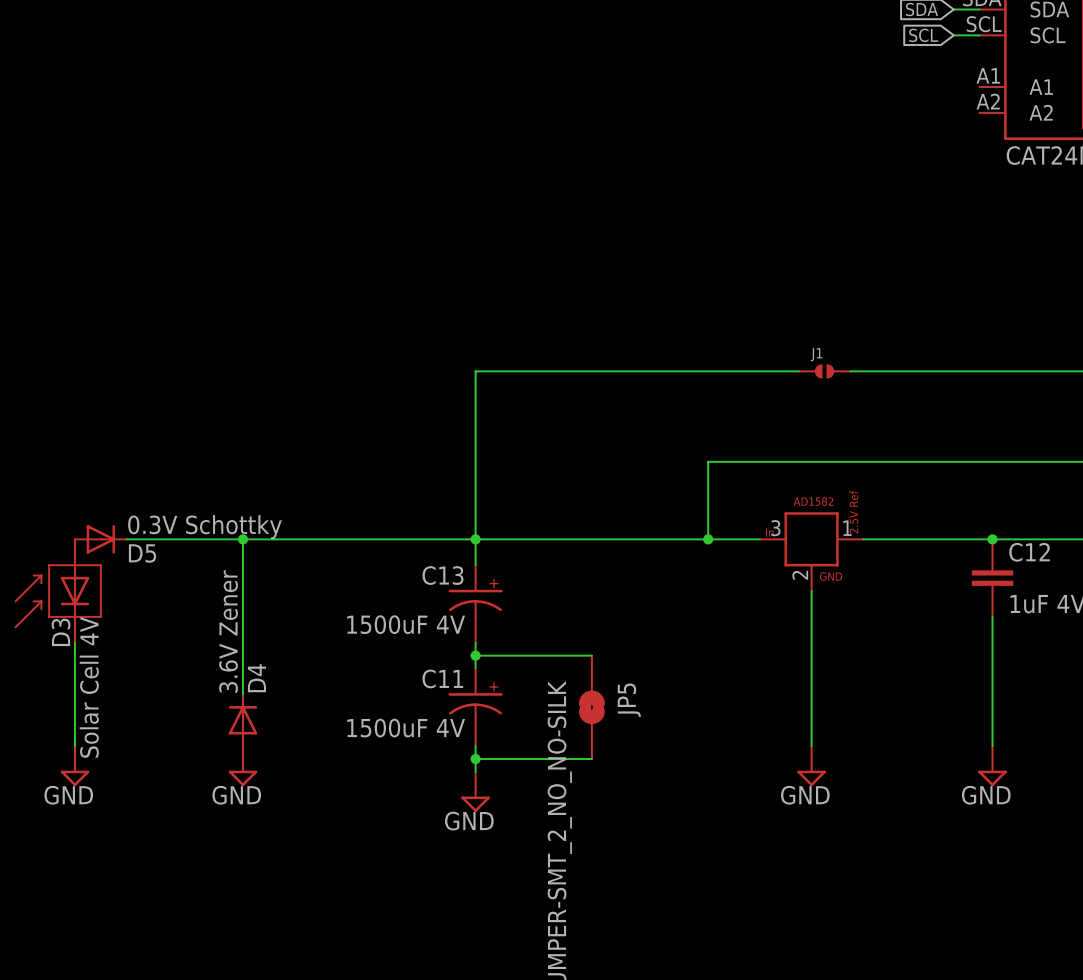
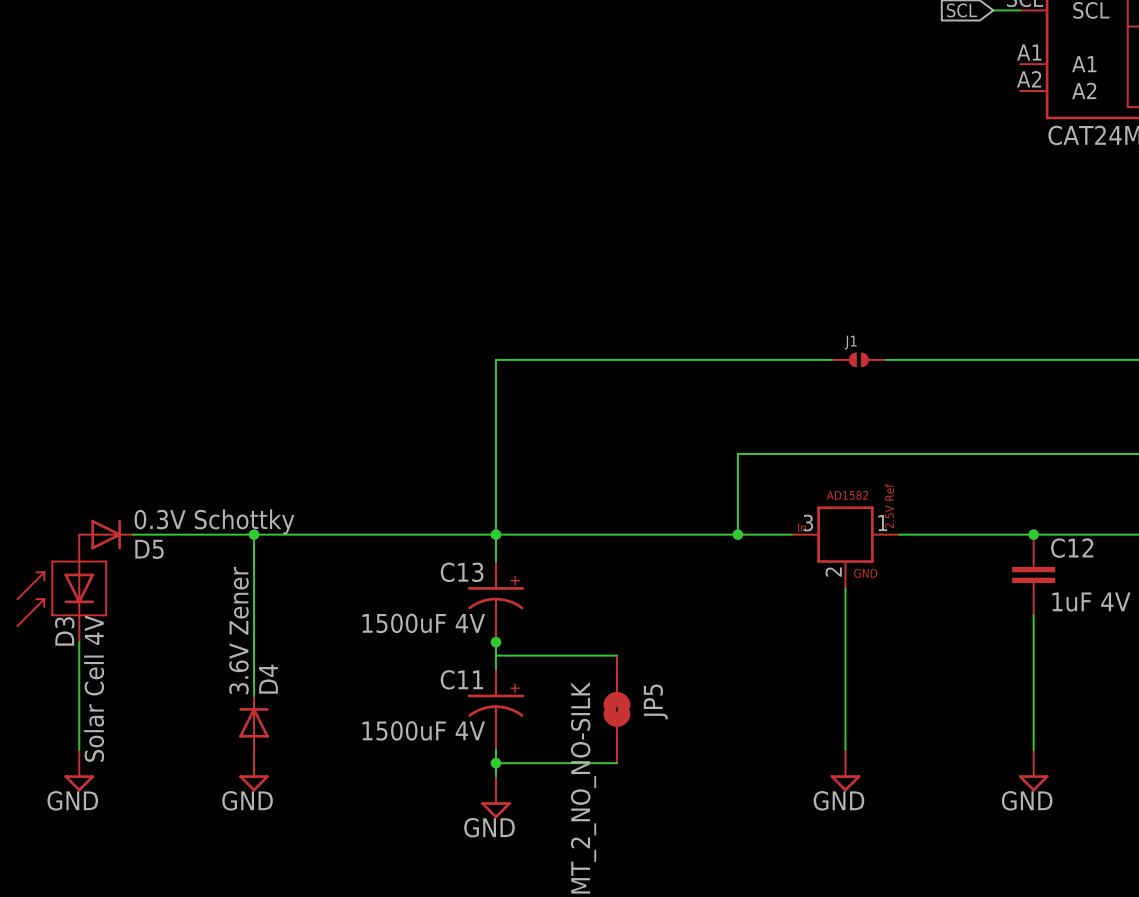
junction position: (475, 655) -> (495, 642)

